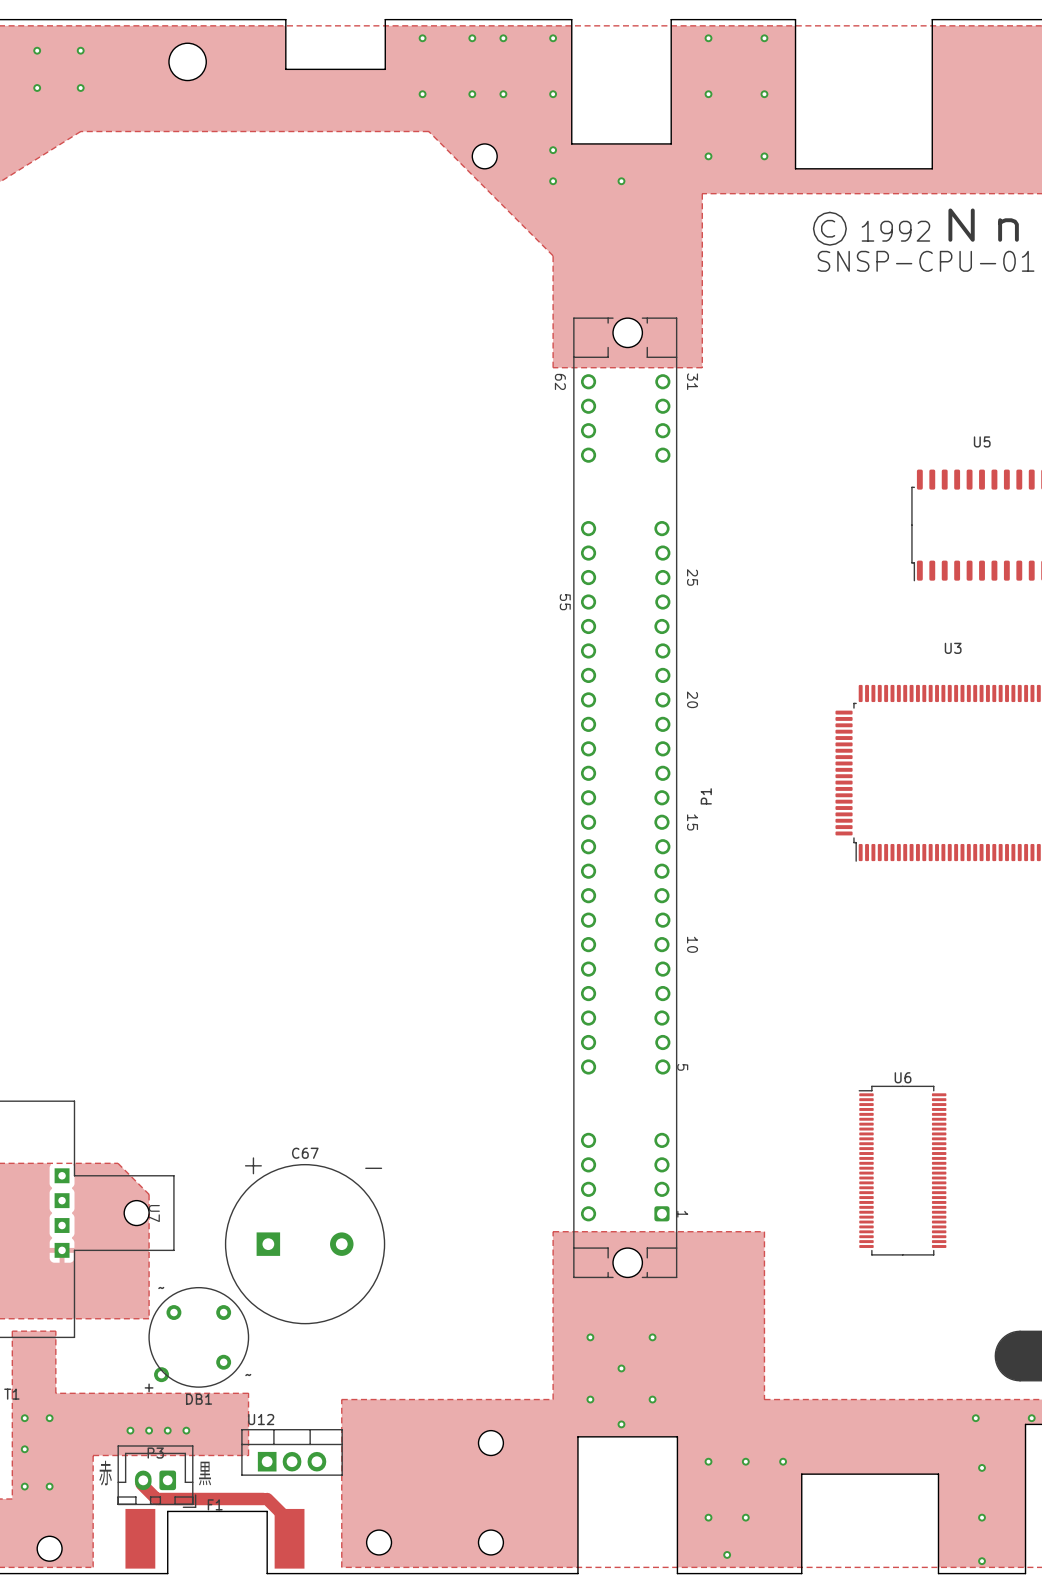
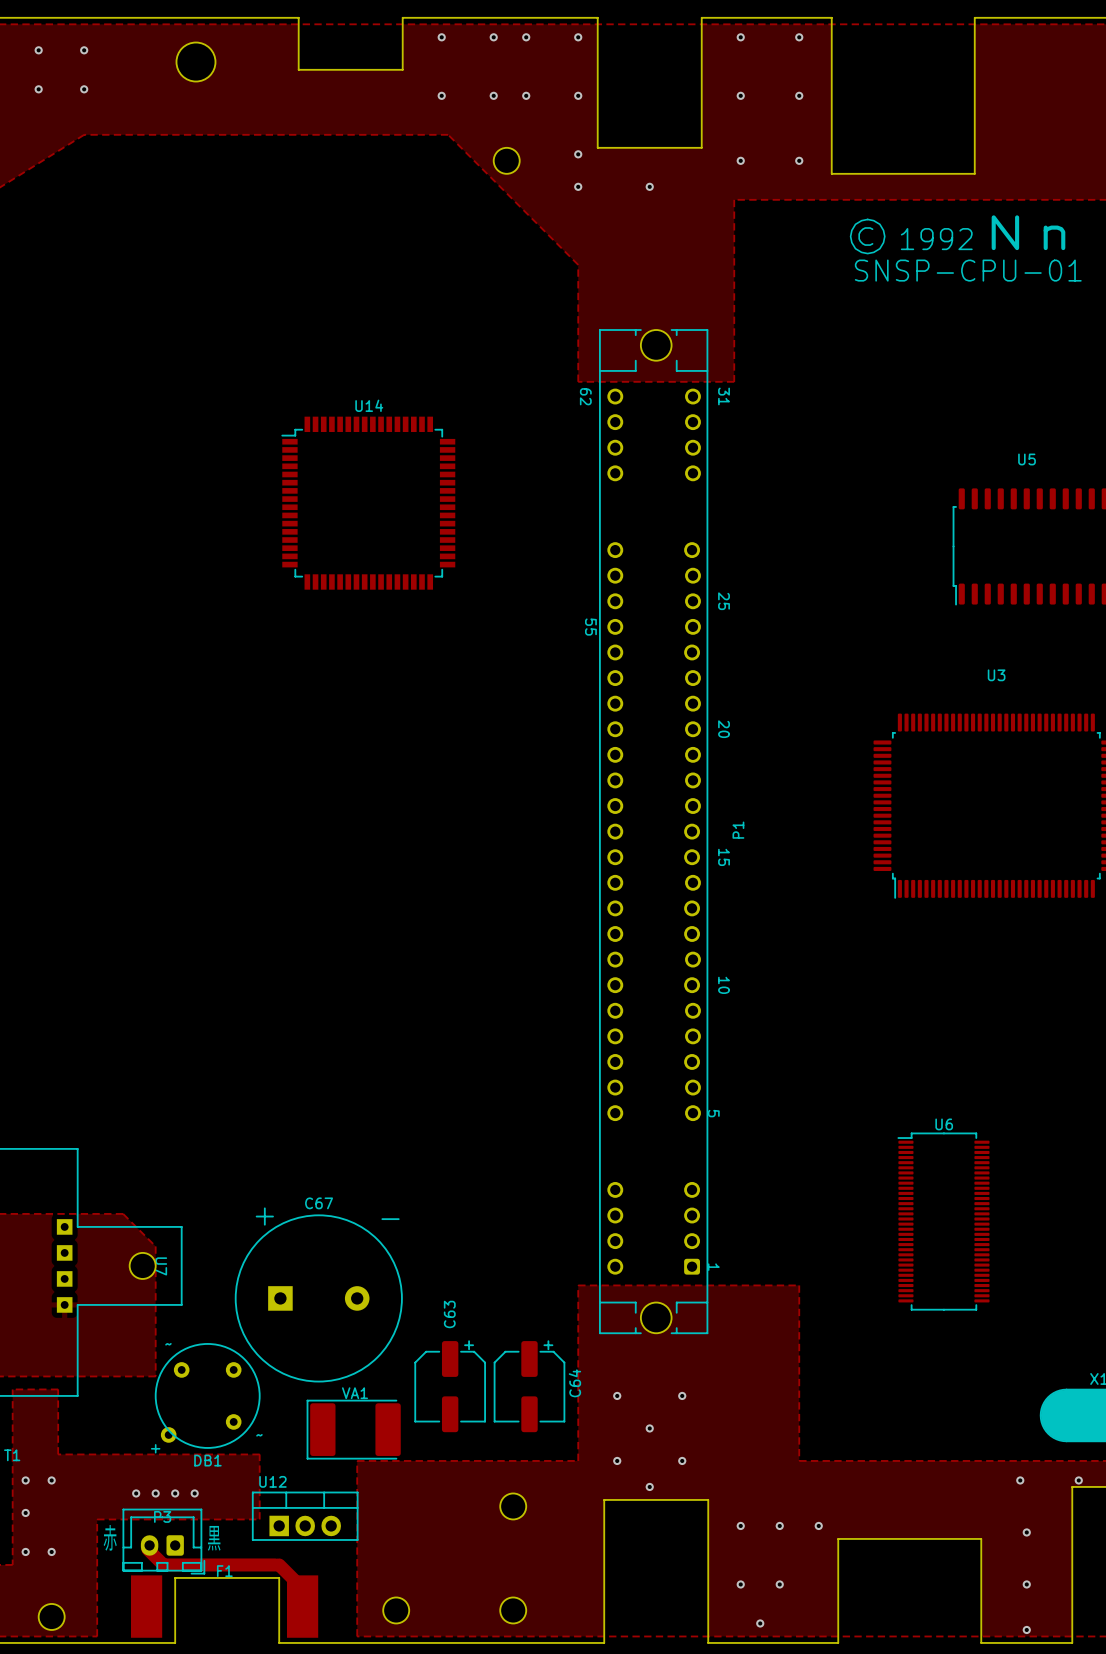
U14: none -> (368, 503)
C63: none -> (450, 1386)
C64: none -> (529, 1386)
VA1: none -> (353, 1429)

